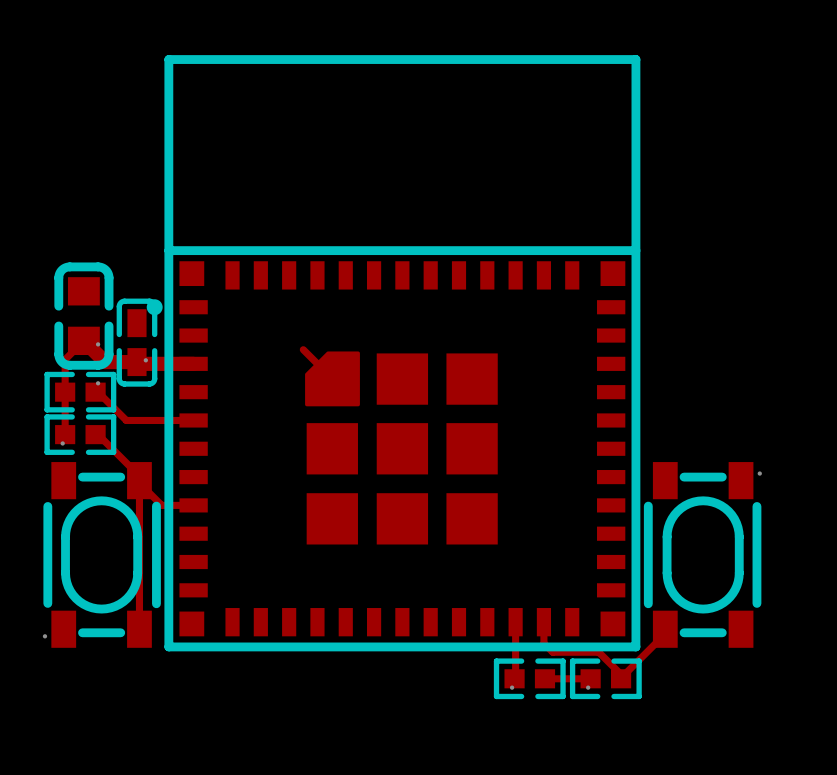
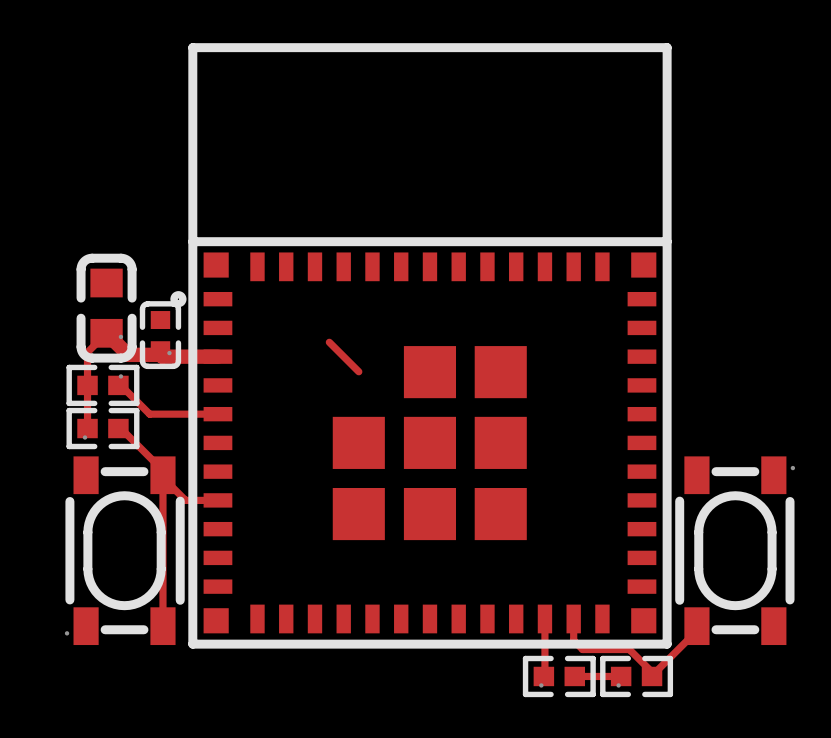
part footprint: [146, 55, 641, 652] -> [170, 43, 672, 649]
part footprint: [116, 298, 158, 387] -> [139, 301, 182, 370]

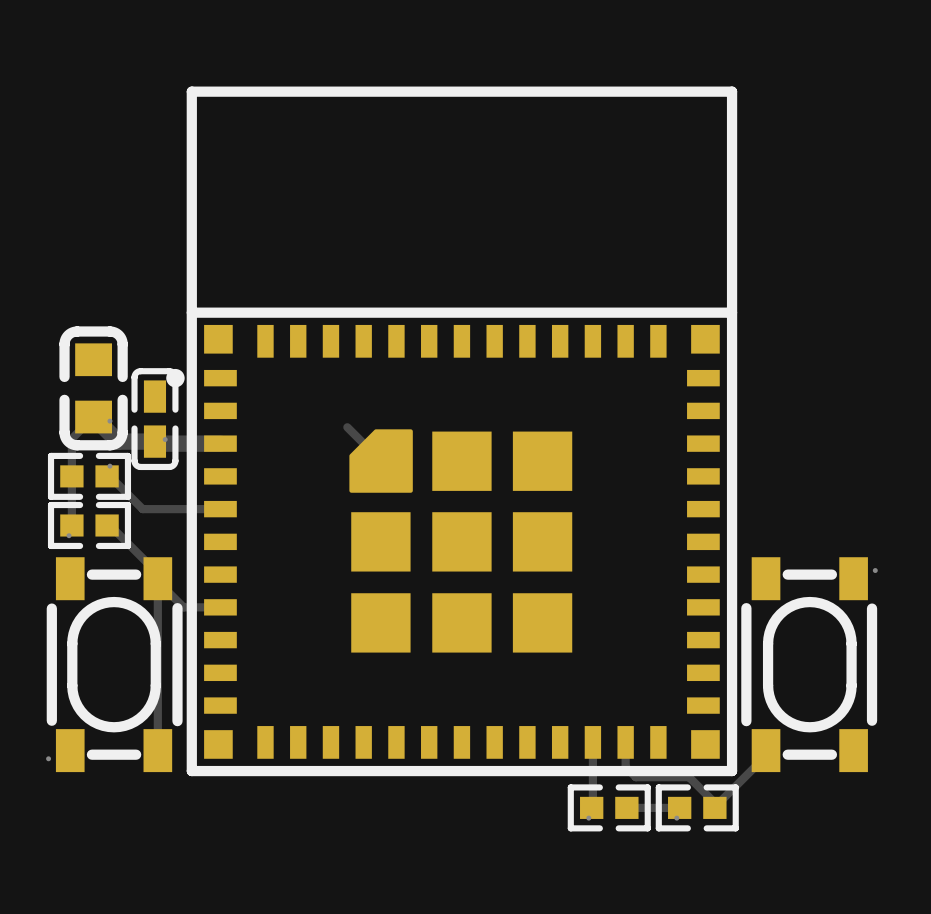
part footprint: [170, 43, 672, 649] -> [166, 86, 738, 777]
part footprint: [139, 301, 182, 370] -> [131, 368, 179, 471]

